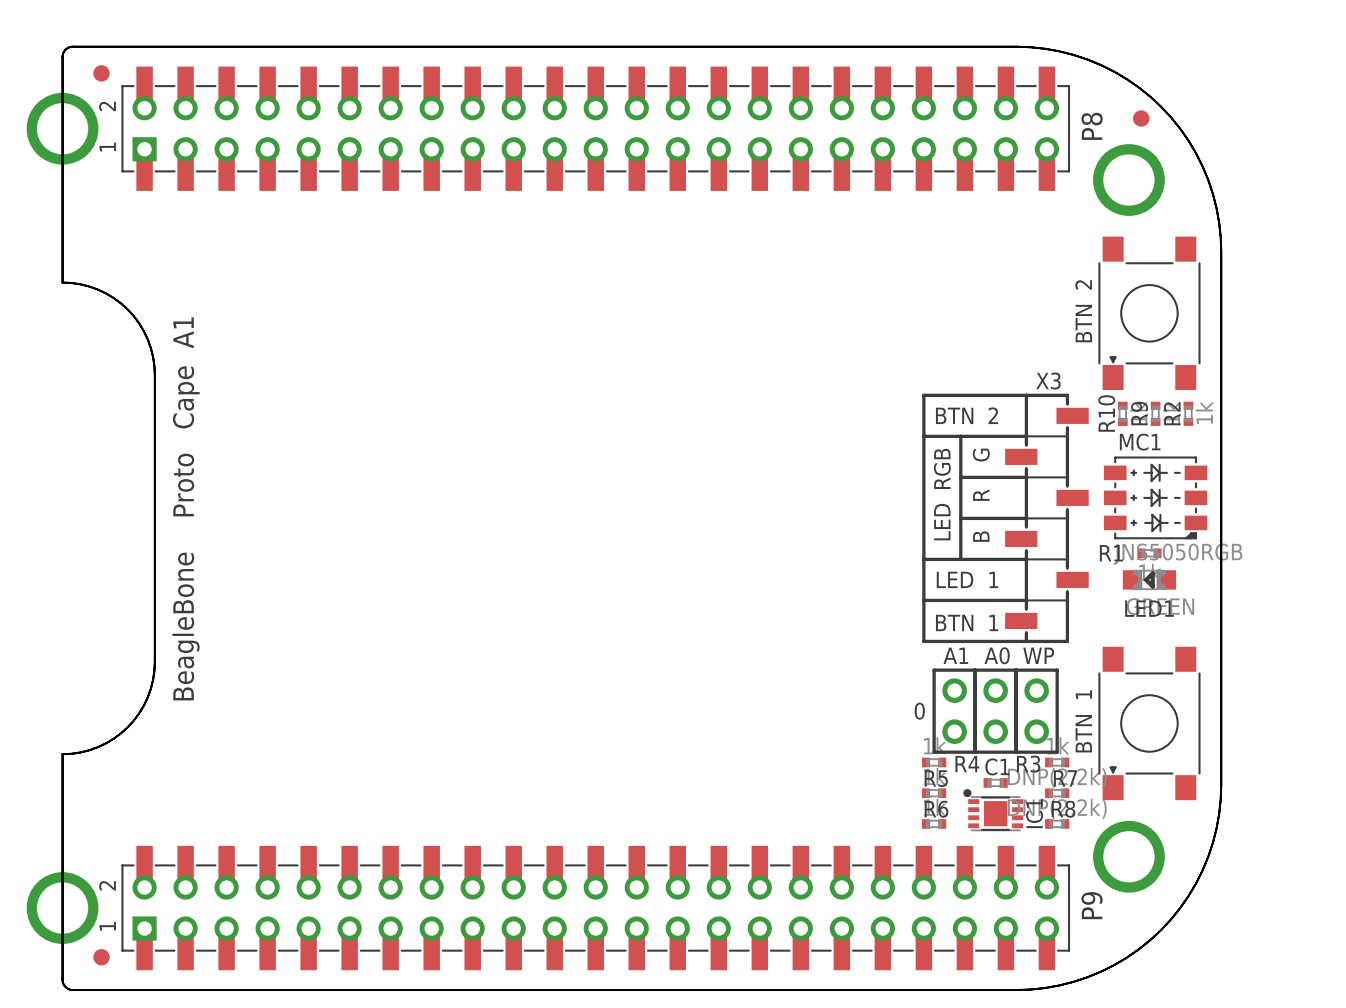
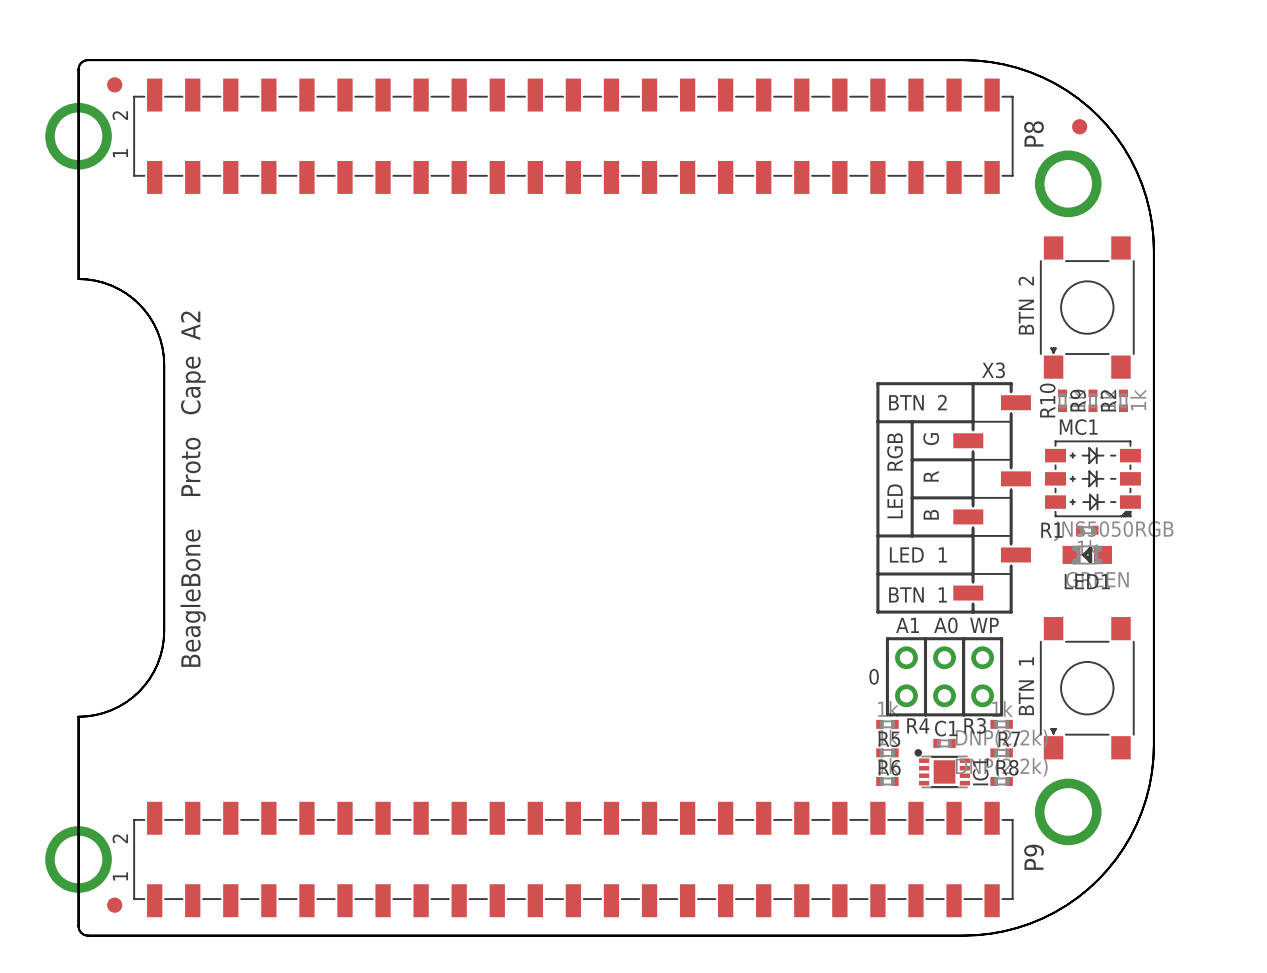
part footprint: [26, 46, 1222, 991] -> [45, 59, 1155, 936]
text: A1 (183, 332) -> A2 (190, 325)

